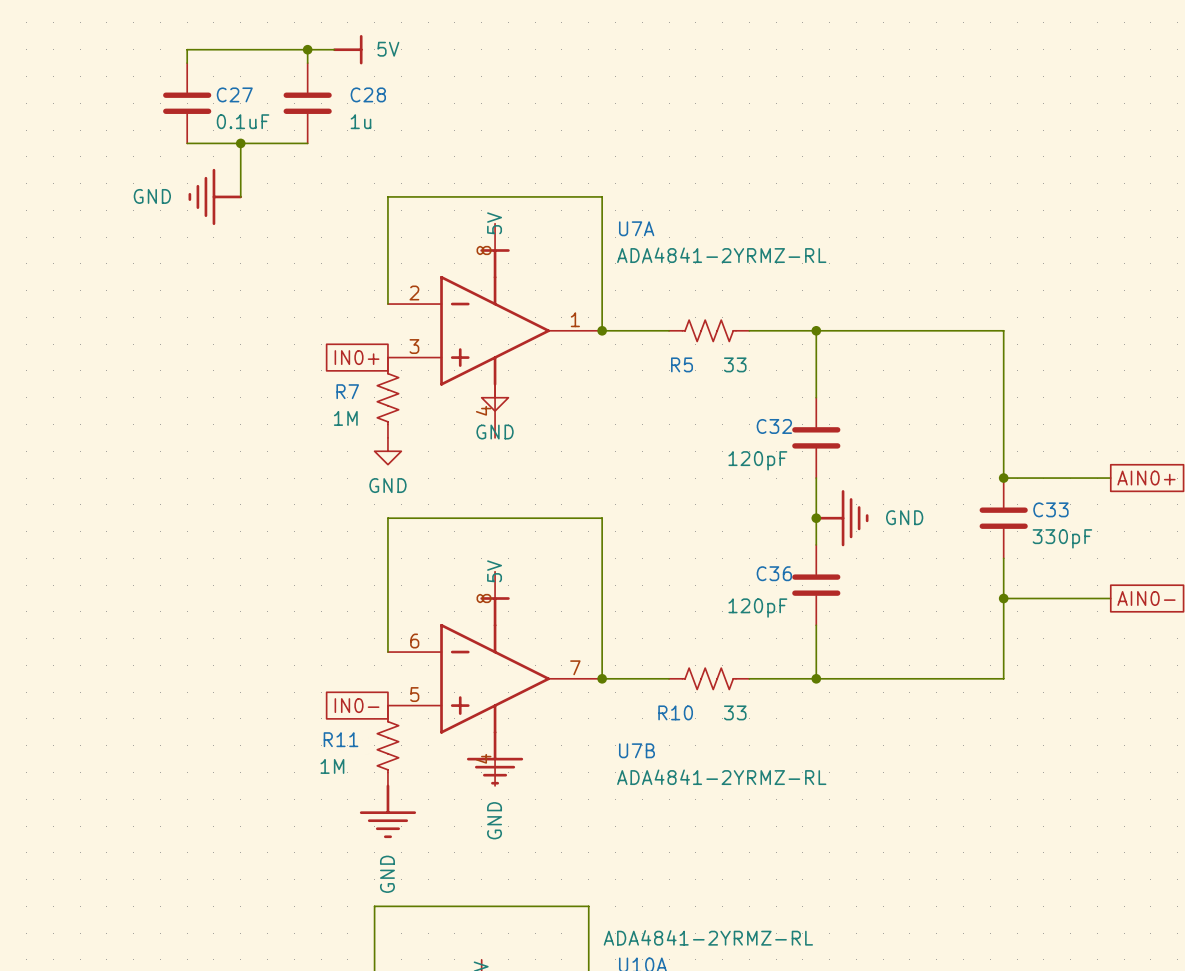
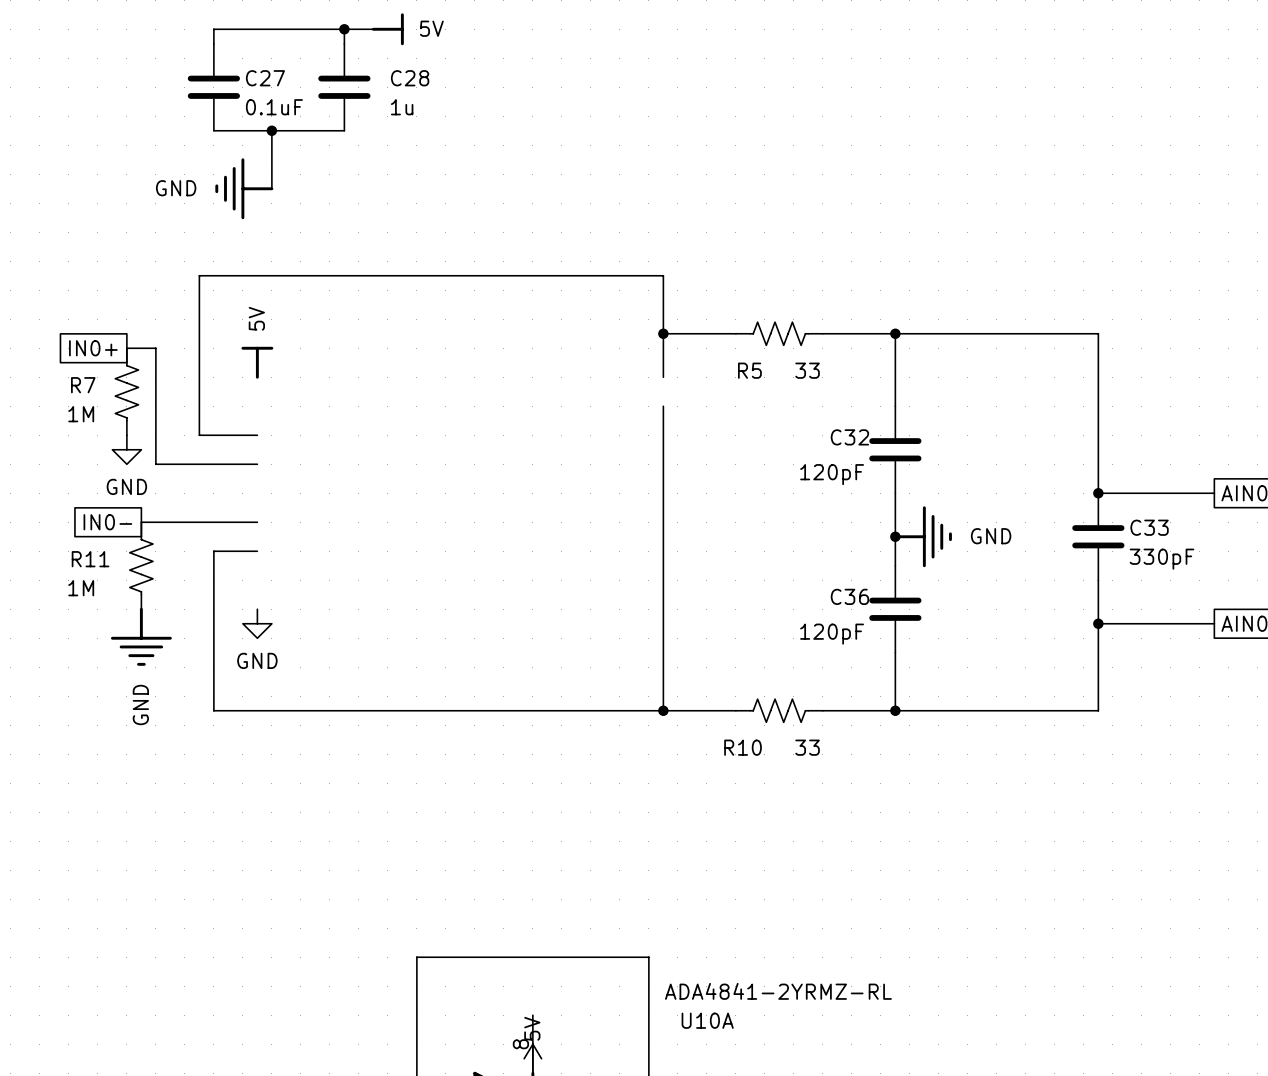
power symbol: 5V (495, 263) -> none
wire: (602, 277) (602, 196) (387, 196) (387, 304) -> (663, 275) (199, 275) (199, 435) (257, 435)
U7A: ADA4841-2YRMZ-RL (495, 330) -> none
wire: none -> (663, 333) (663, 377)
global label: none -> IN0+ (93, 348)
wire: none -> (126, 348) (155, 348) (155, 464) (257, 464)
power symbol: none -> 5V (257, 362)
global label: IN0+ (357, 357) -> none
R7 position: (387, 397) -> (126, 391)
power symbol: GND (495, 397) -> none
power symbol: none -> GND (126, 449)
power symbol: GND (387, 451) -> none
global label: none -> IN0- (107, 522)
wire: none -> (141, 522) (257, 522)
wire: (602, 518) (387, 518) (387, 652) -> (663, 536) (663, 406)
wire: none -> (257, 551) (213, 551) (213, 710) (663, 710)
power symbol: none -> GND (257, 623)
power symbol: none -> GND (141, 636)
power symbol: 5V (495, 611) -> none
U7B: ADA4841-2YRMZ-RL (495, 678) -> none
global label: IN0- (357, 705) -> none
R11 position: (387, 745) -> (141, 565)
power symbol: GND (495, 757) -> none
power symbol: GND (387, 811) -> none

